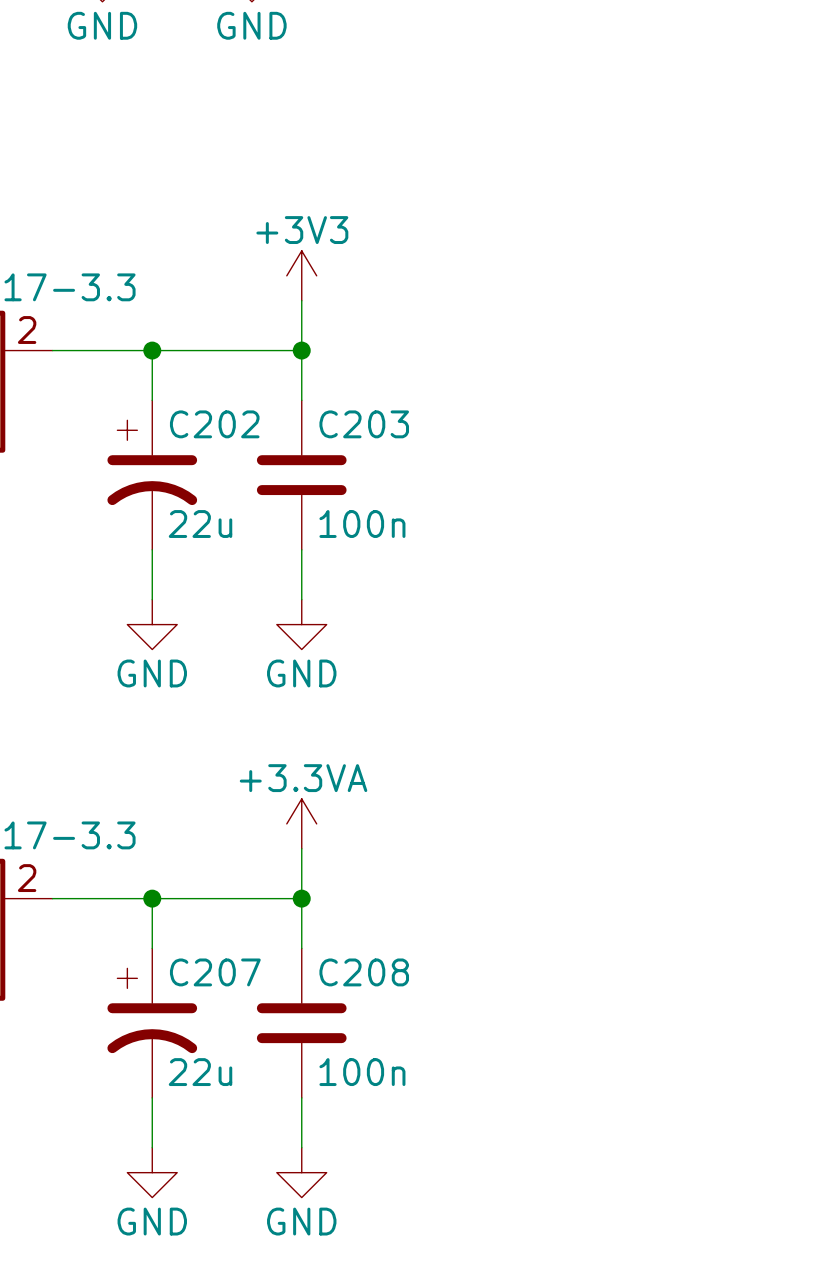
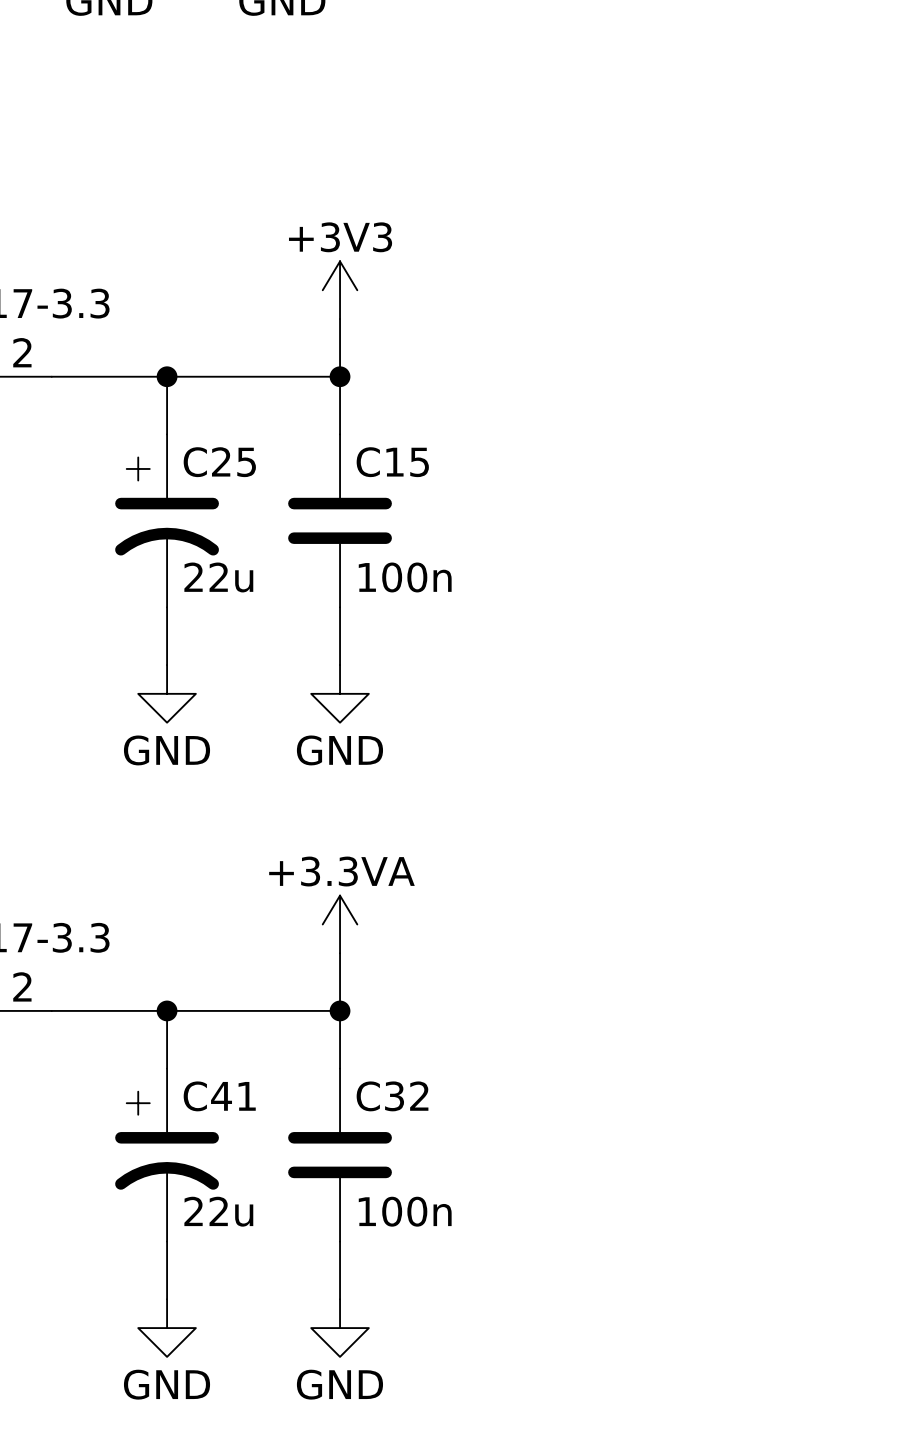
C202 name: C202 (214, 424) -> C25 (219, 462)
C203 name: C203 (364, 424) -> C15 (392, 462)
C207 name: C207 (215, 972) -> C41 (219, 1096)
C208 name: C208 (364, 972) -> C32 (392, 1096)

